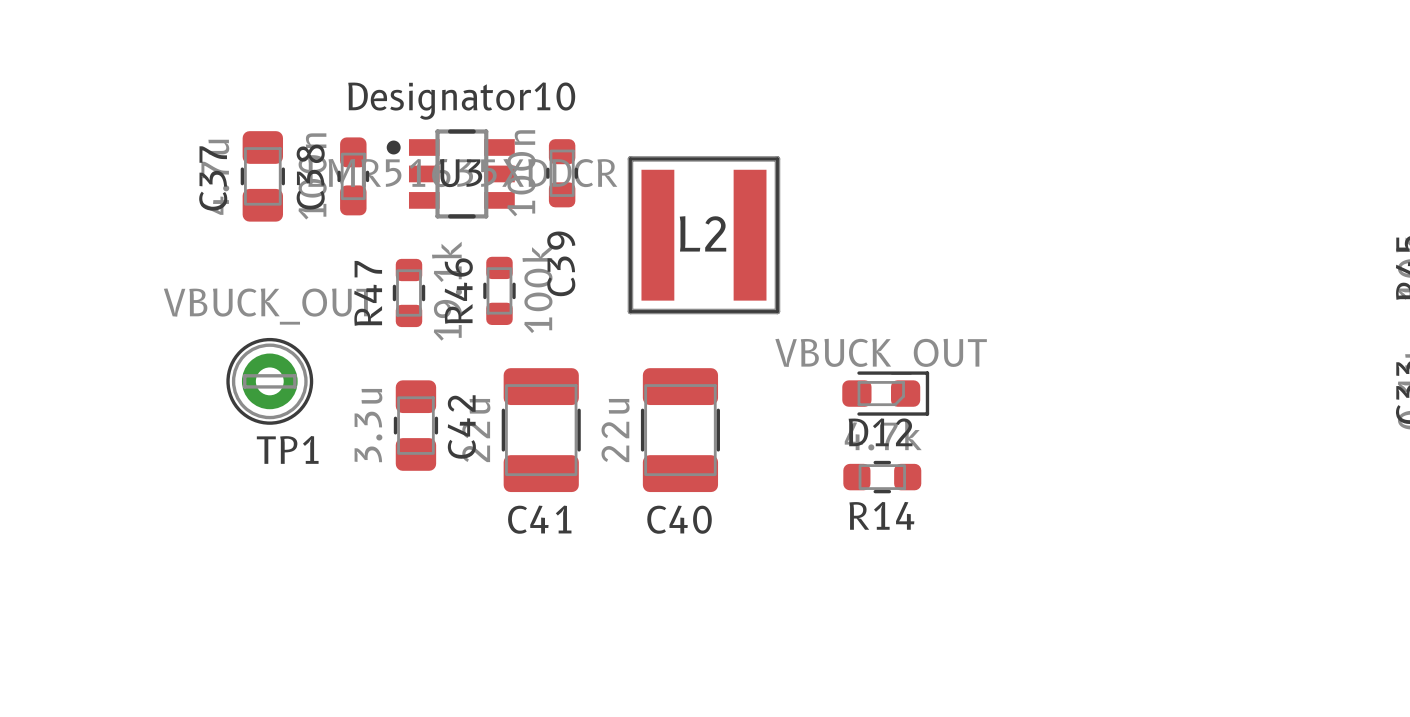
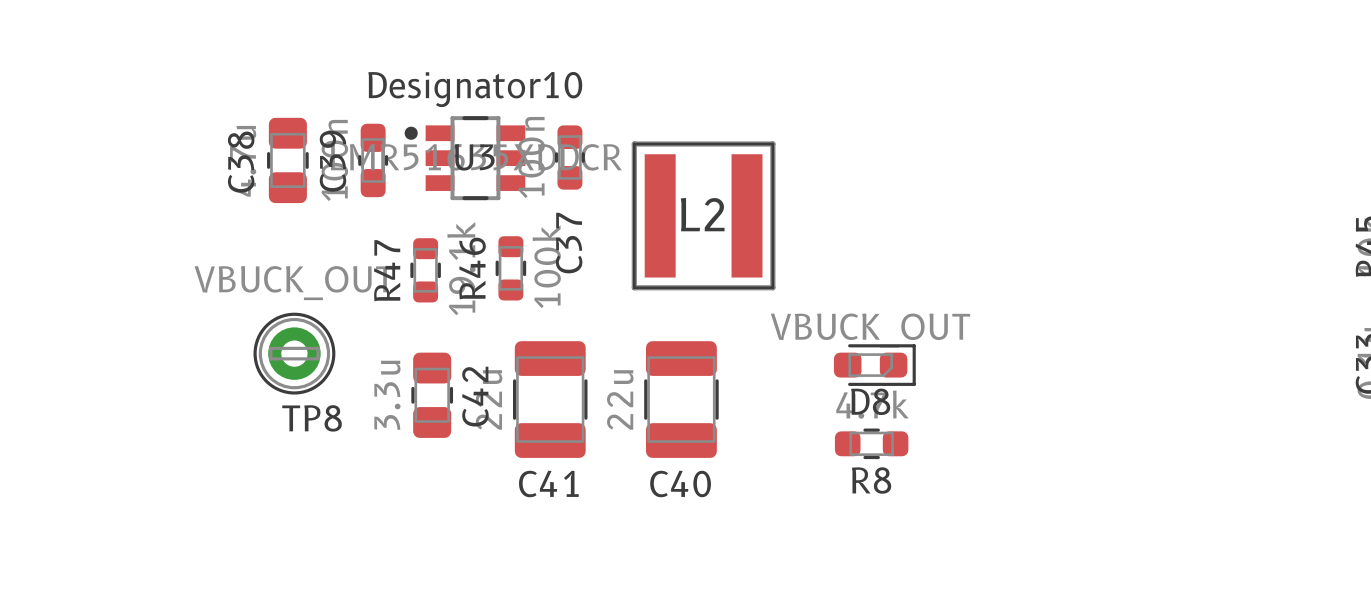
C38 name: C38 (310, 177) -> C39 (332, 161)
C37 name: C37 (213, 178) -> C38 (241, 162)
C39 name: C39 (561, 263) -> C37 (569, 243)
D12 name: D12 (880, 432) -> D8 (870, 401)
TP1 name: TP1 (287, 449) -> TP8 (312, 418)
R14 name: R14 (881, 515) -> R8 (871, 480)

